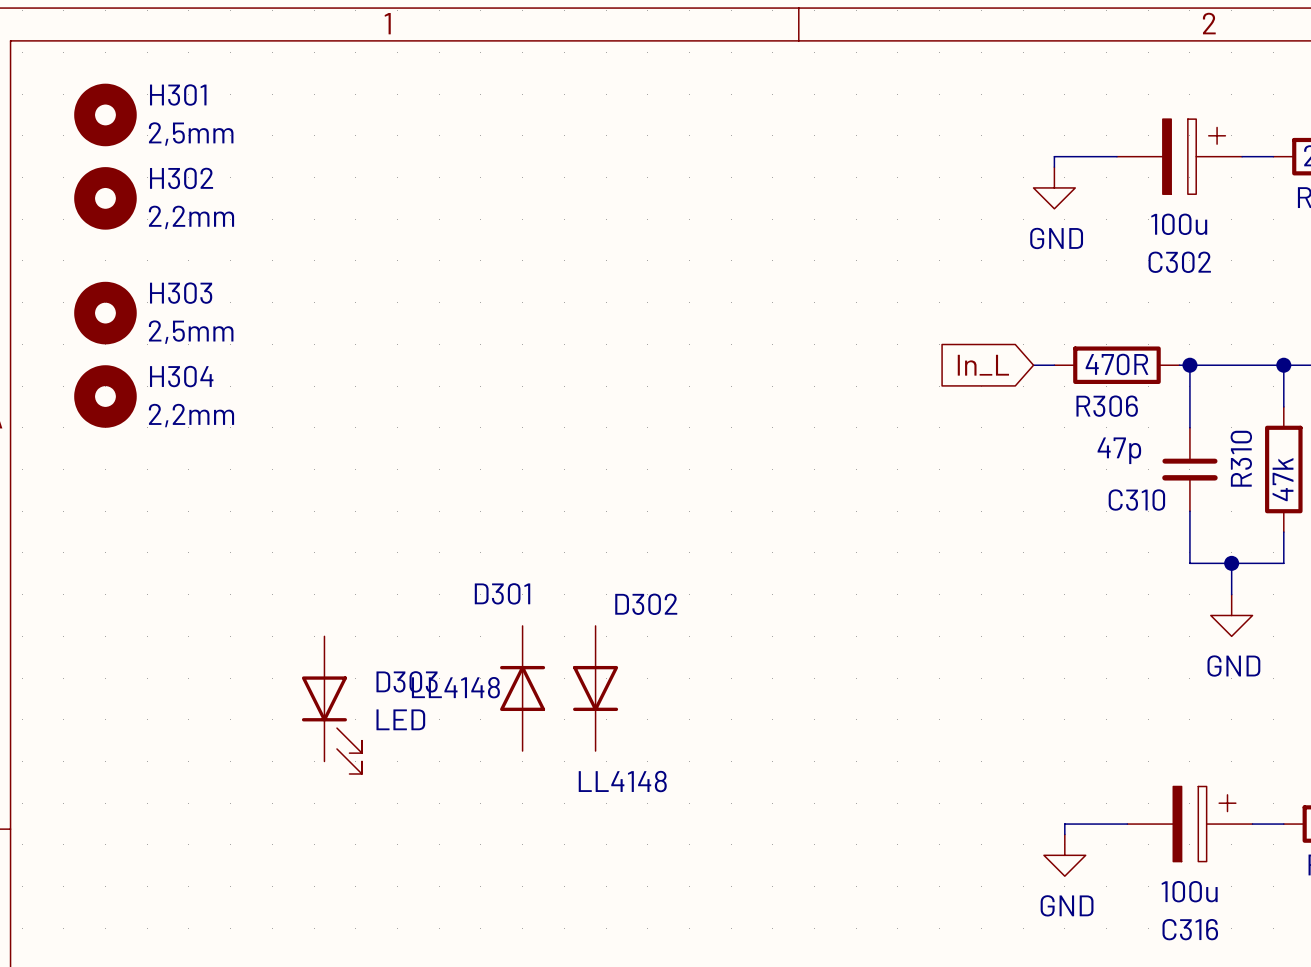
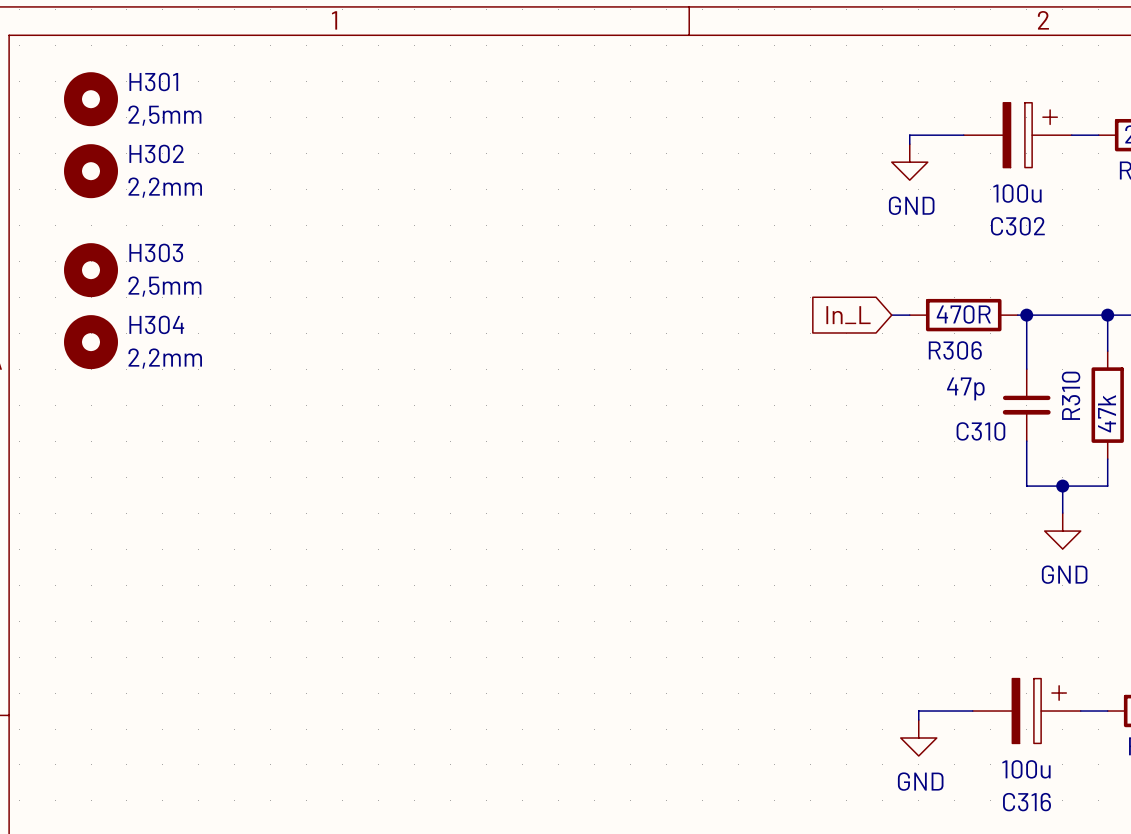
D301: LL4148 (522, 688) -> none
D302: LL4148 (595, 688) -> none
D303: LED (331, 705) -> none

